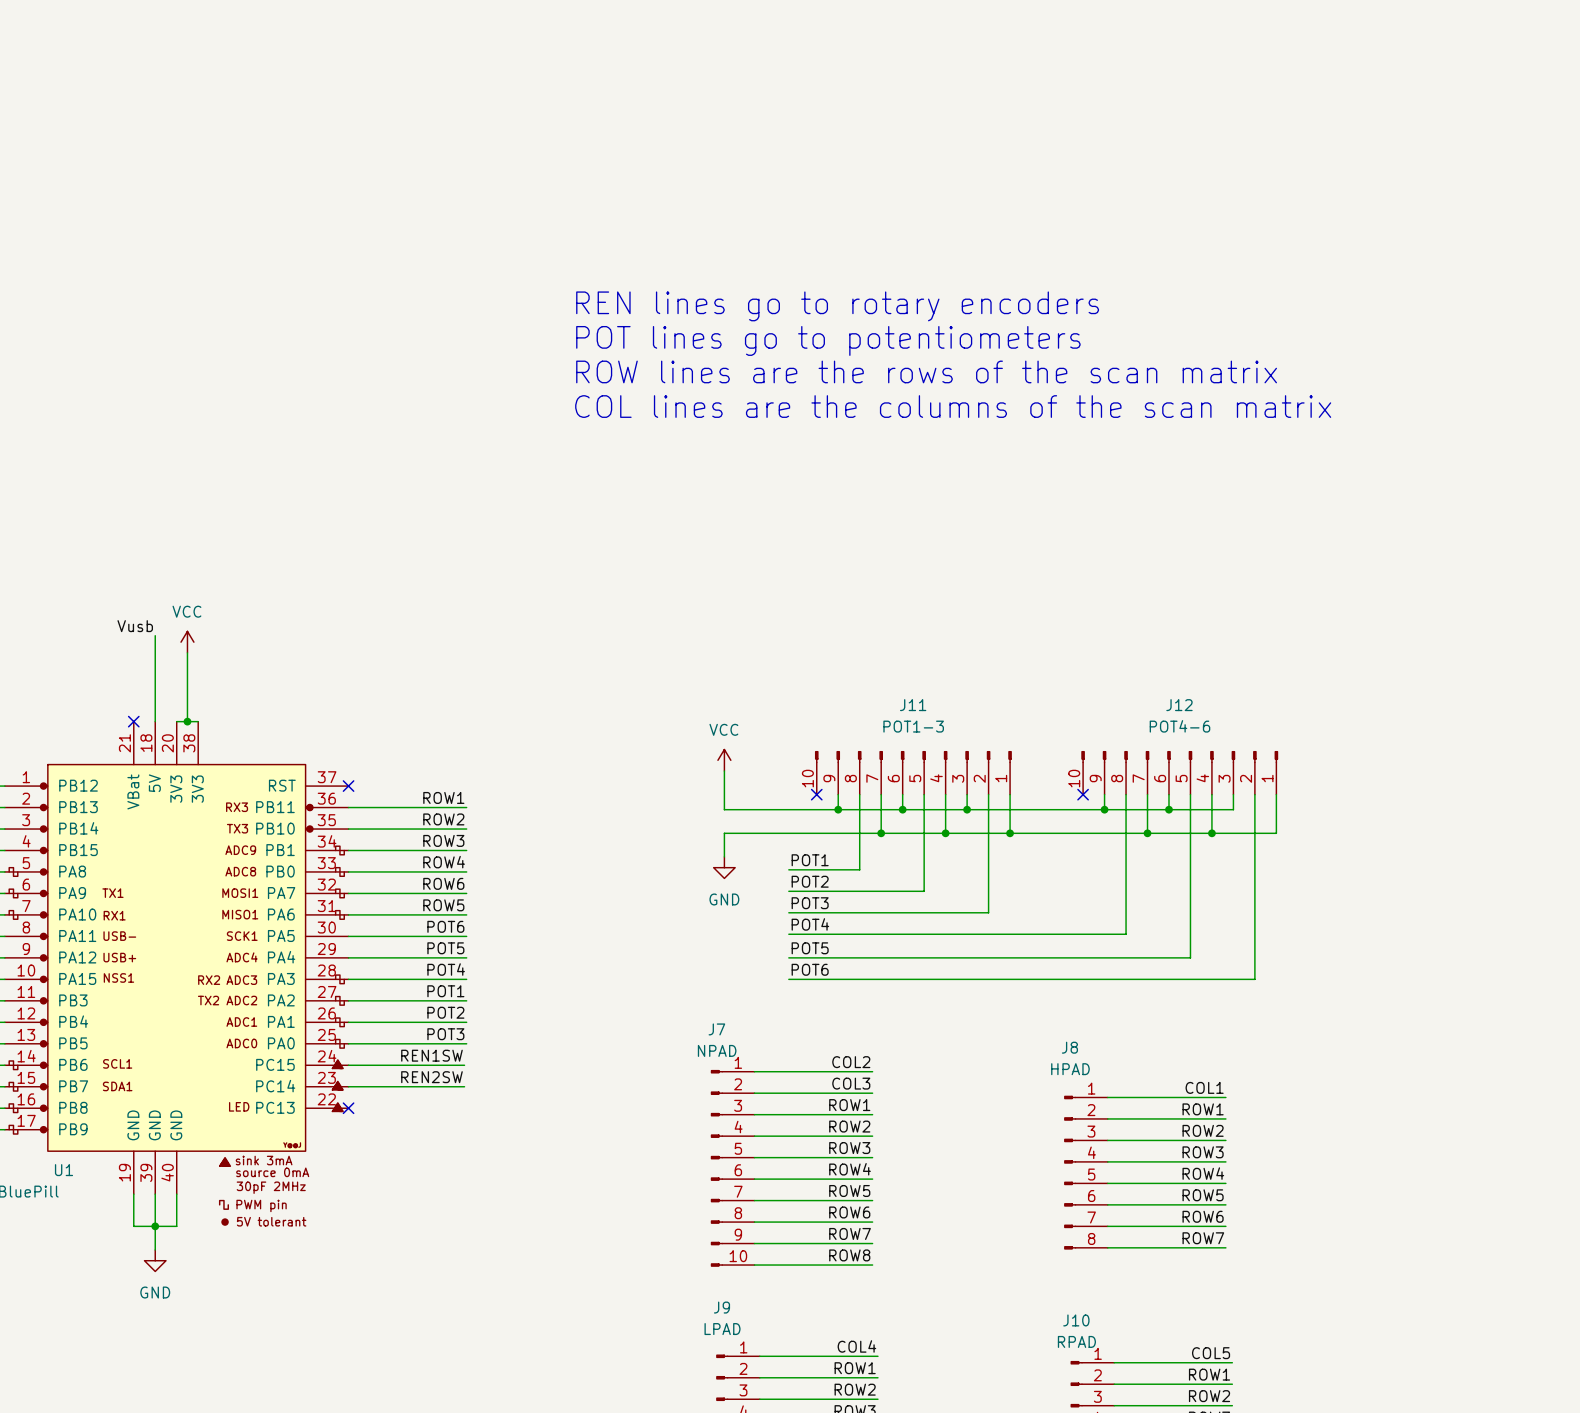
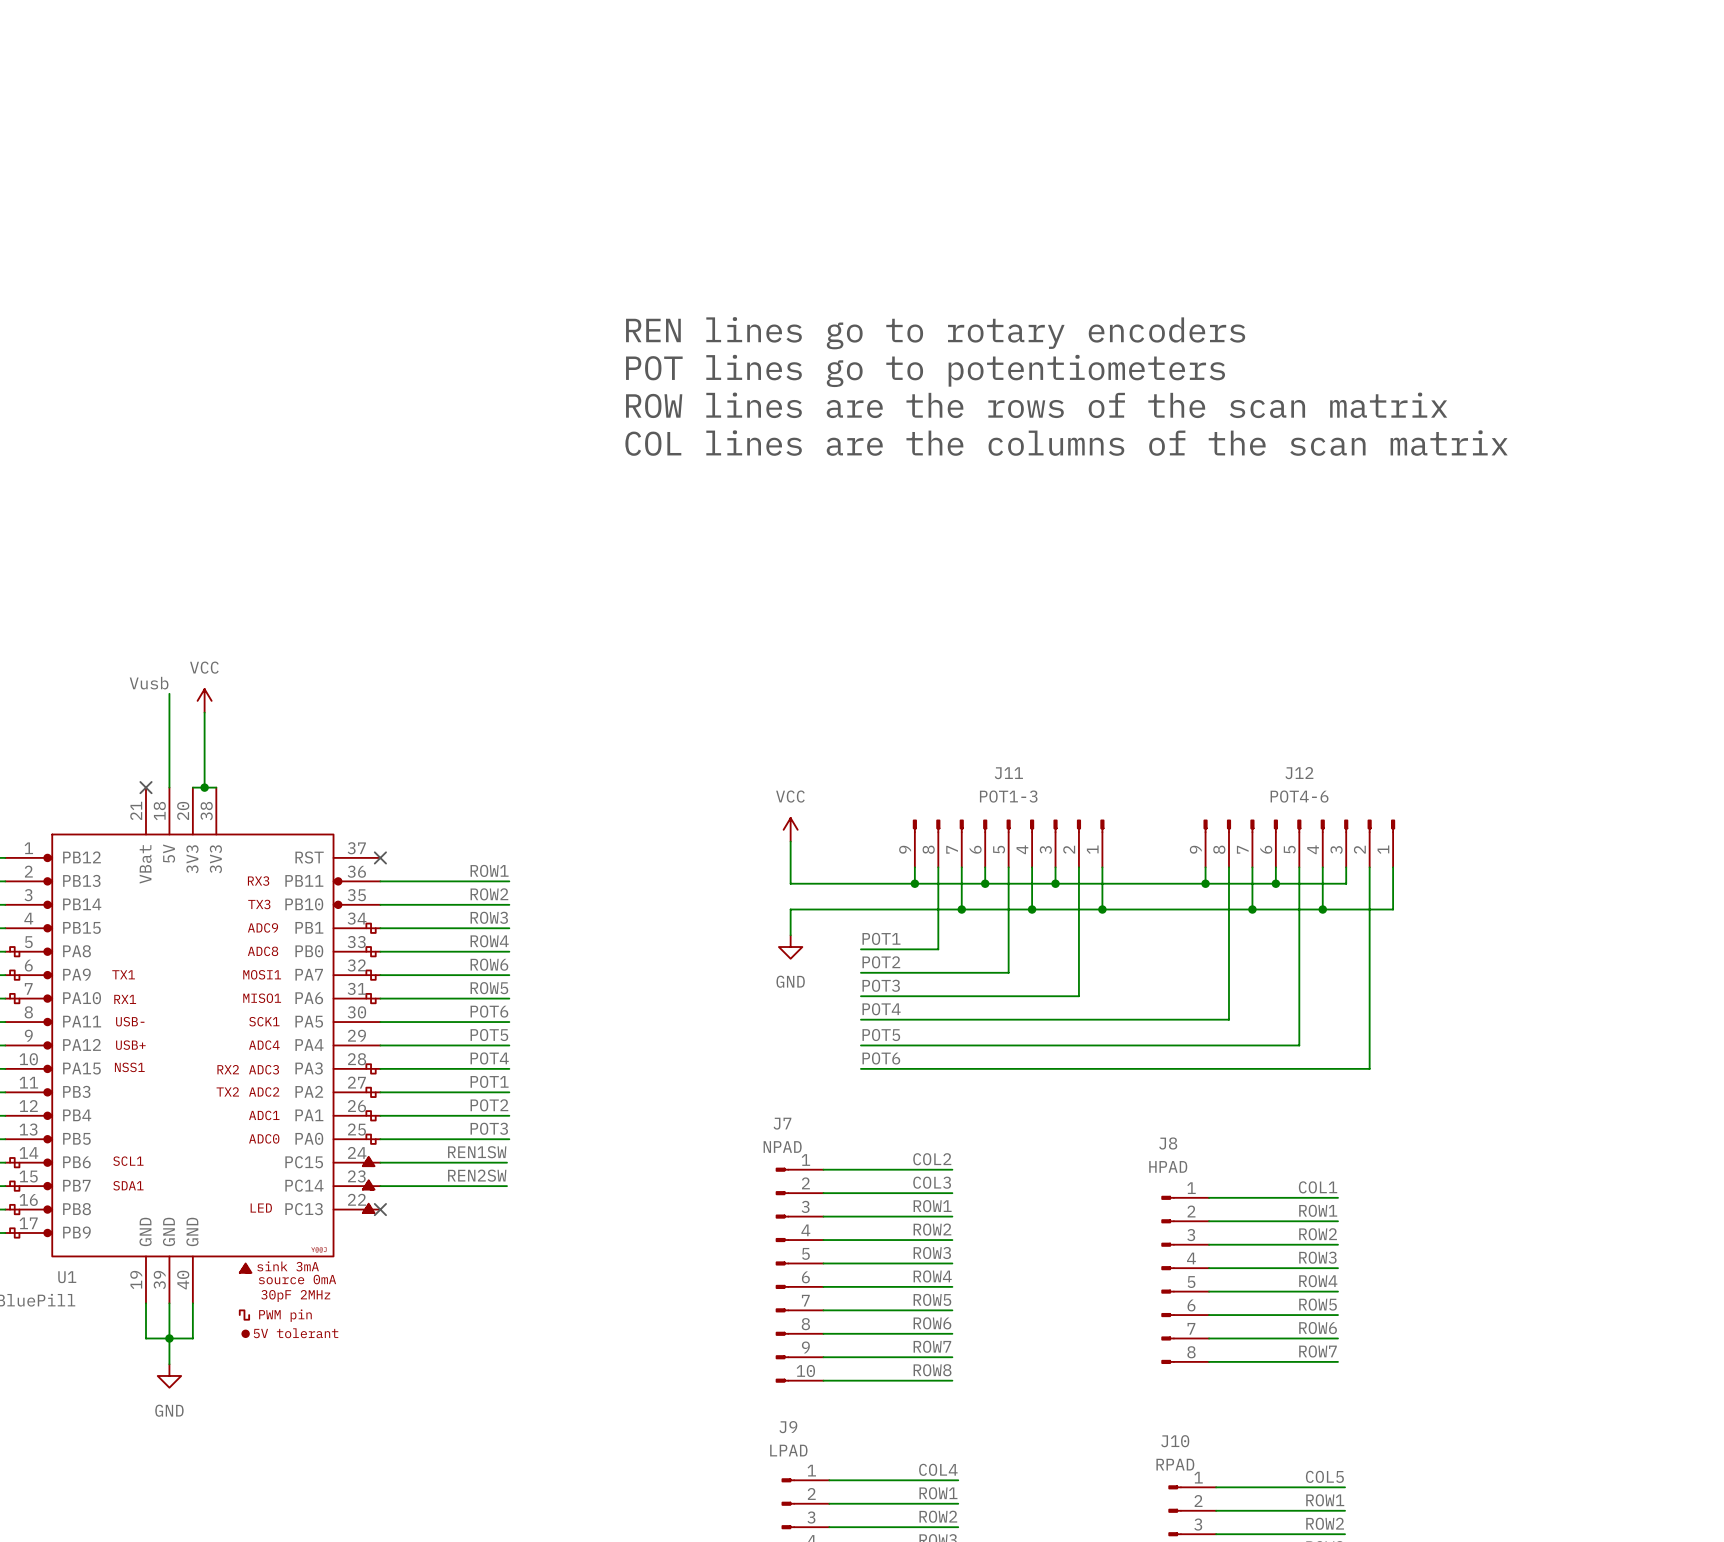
J11 symbol: [815, 751, 1012, 795] -> [913, 819, 1105, 868]
J12 symbol: [1081, 751, 1279, 795] -> [1203, 819, 1395, 868]
no-connect mark: (816, 794) -> none
no-connect mark: (1083, 794) -> none

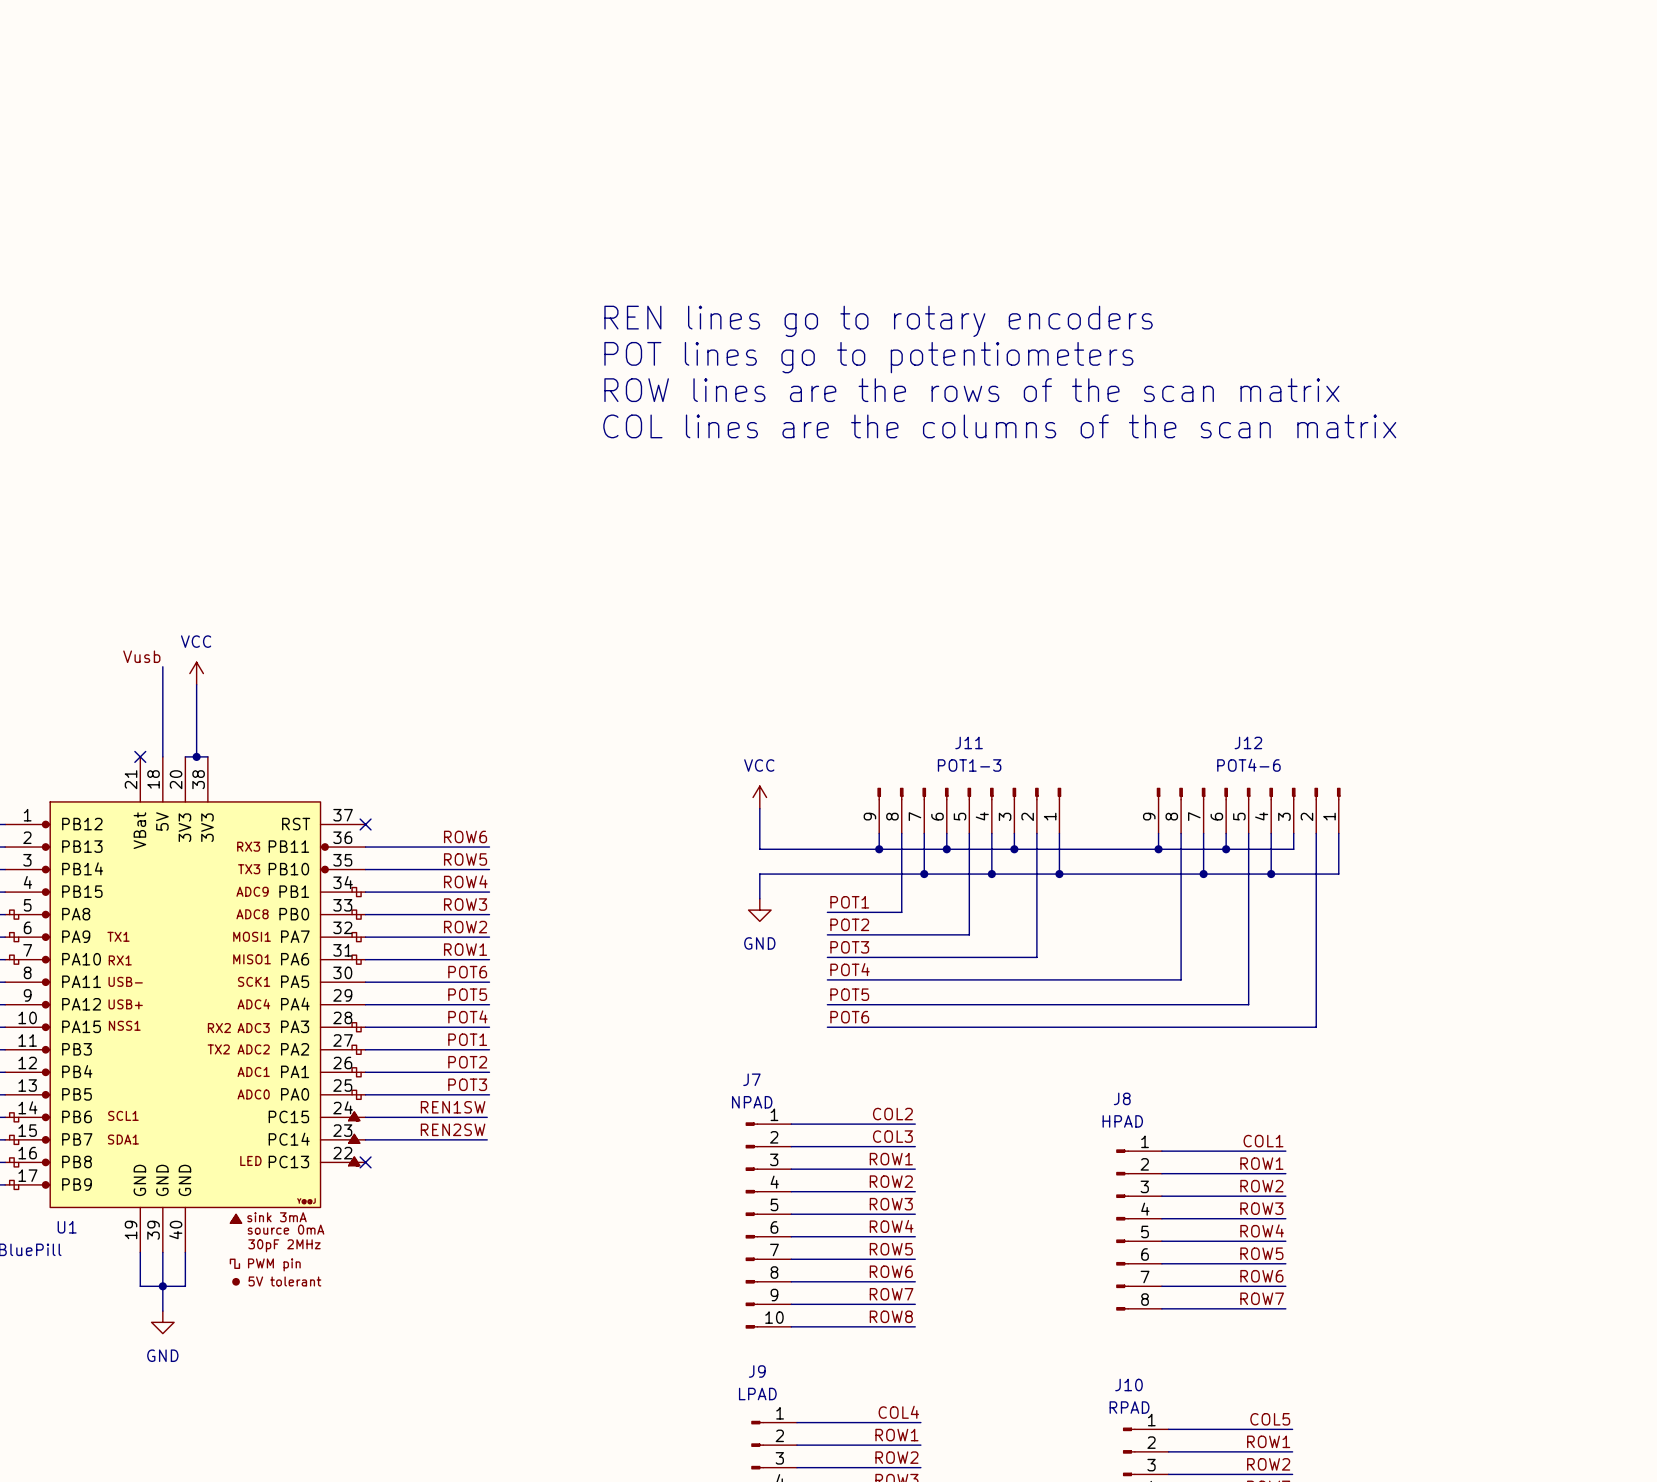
label: ROW1 (489, 870) -> ROW6 (465, 836)
label: ROW2 (489, 894) -> ROW5 (465, 859)
label: ROW3 (489, 917) -> ROW4 (465, 881)
label: ROW4 (489, 941) -> ROW3 (465, 904)
label: ROW6 (489, 964) -> ROW2 (465, 927)
label: ROW5 (489, 988) -> ROW1 (465, 949)

